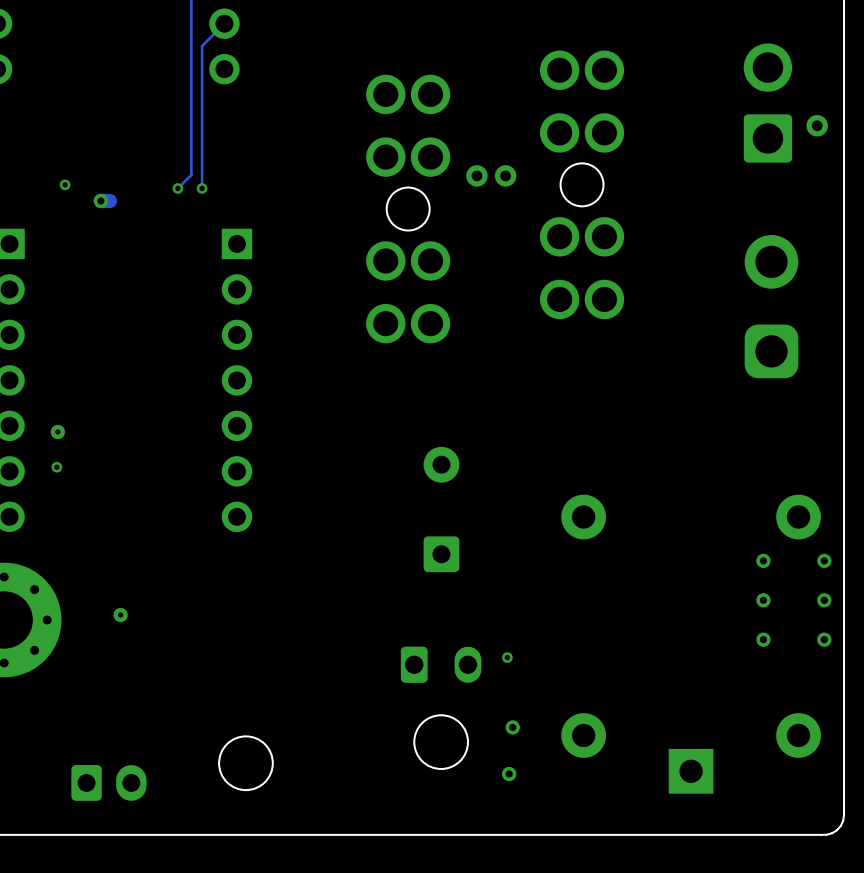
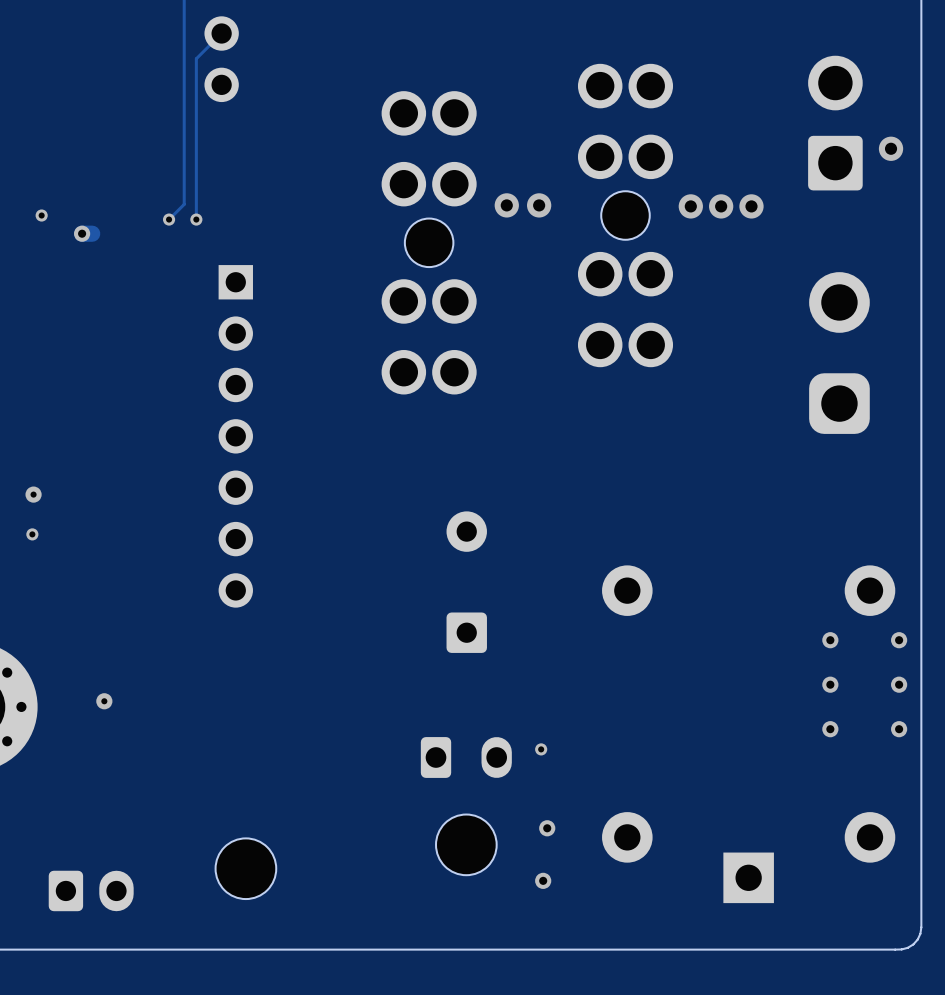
via: none -> (690, 206)
via: none -> (721, 206)
via: none -> (751, 206)

